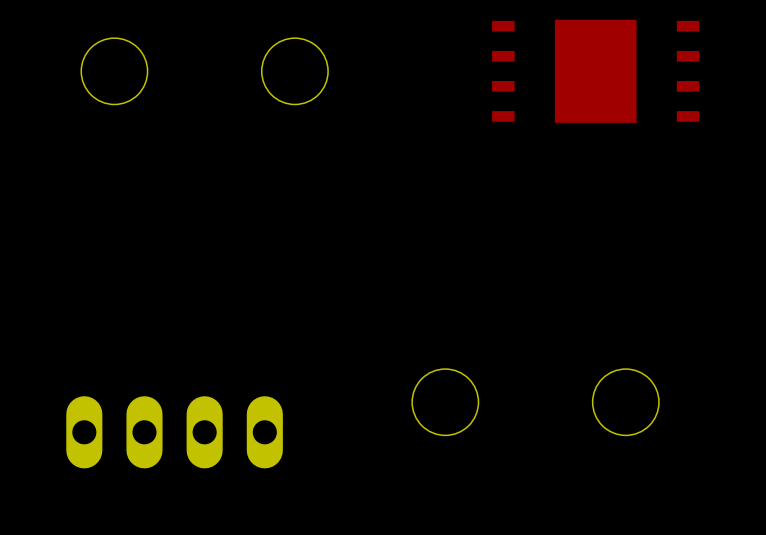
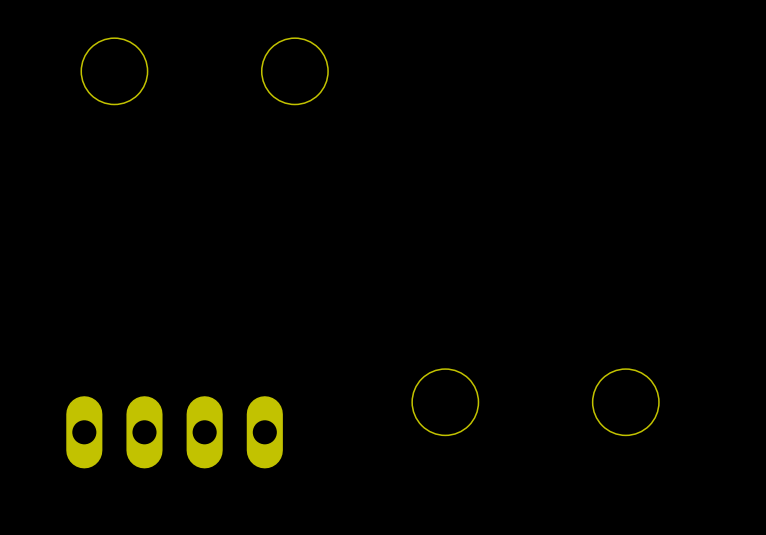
part: (595, 71) -> none

